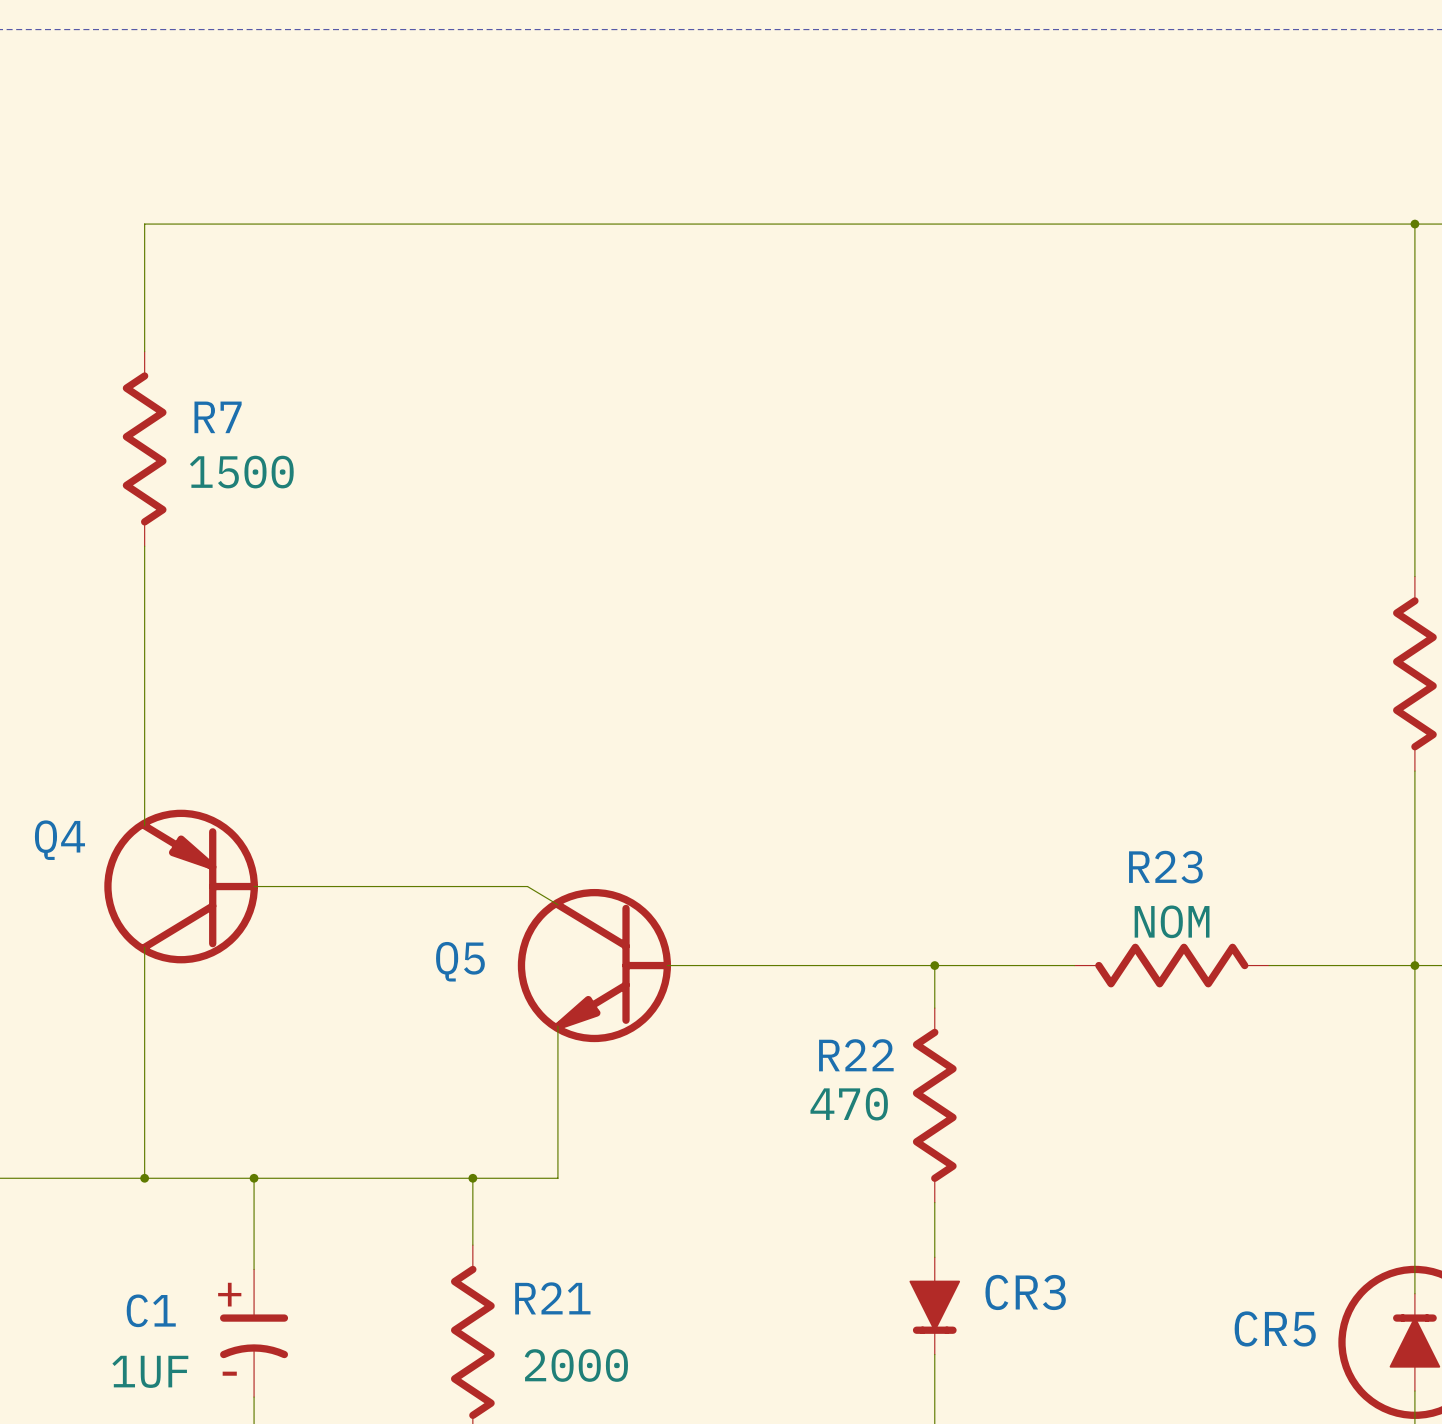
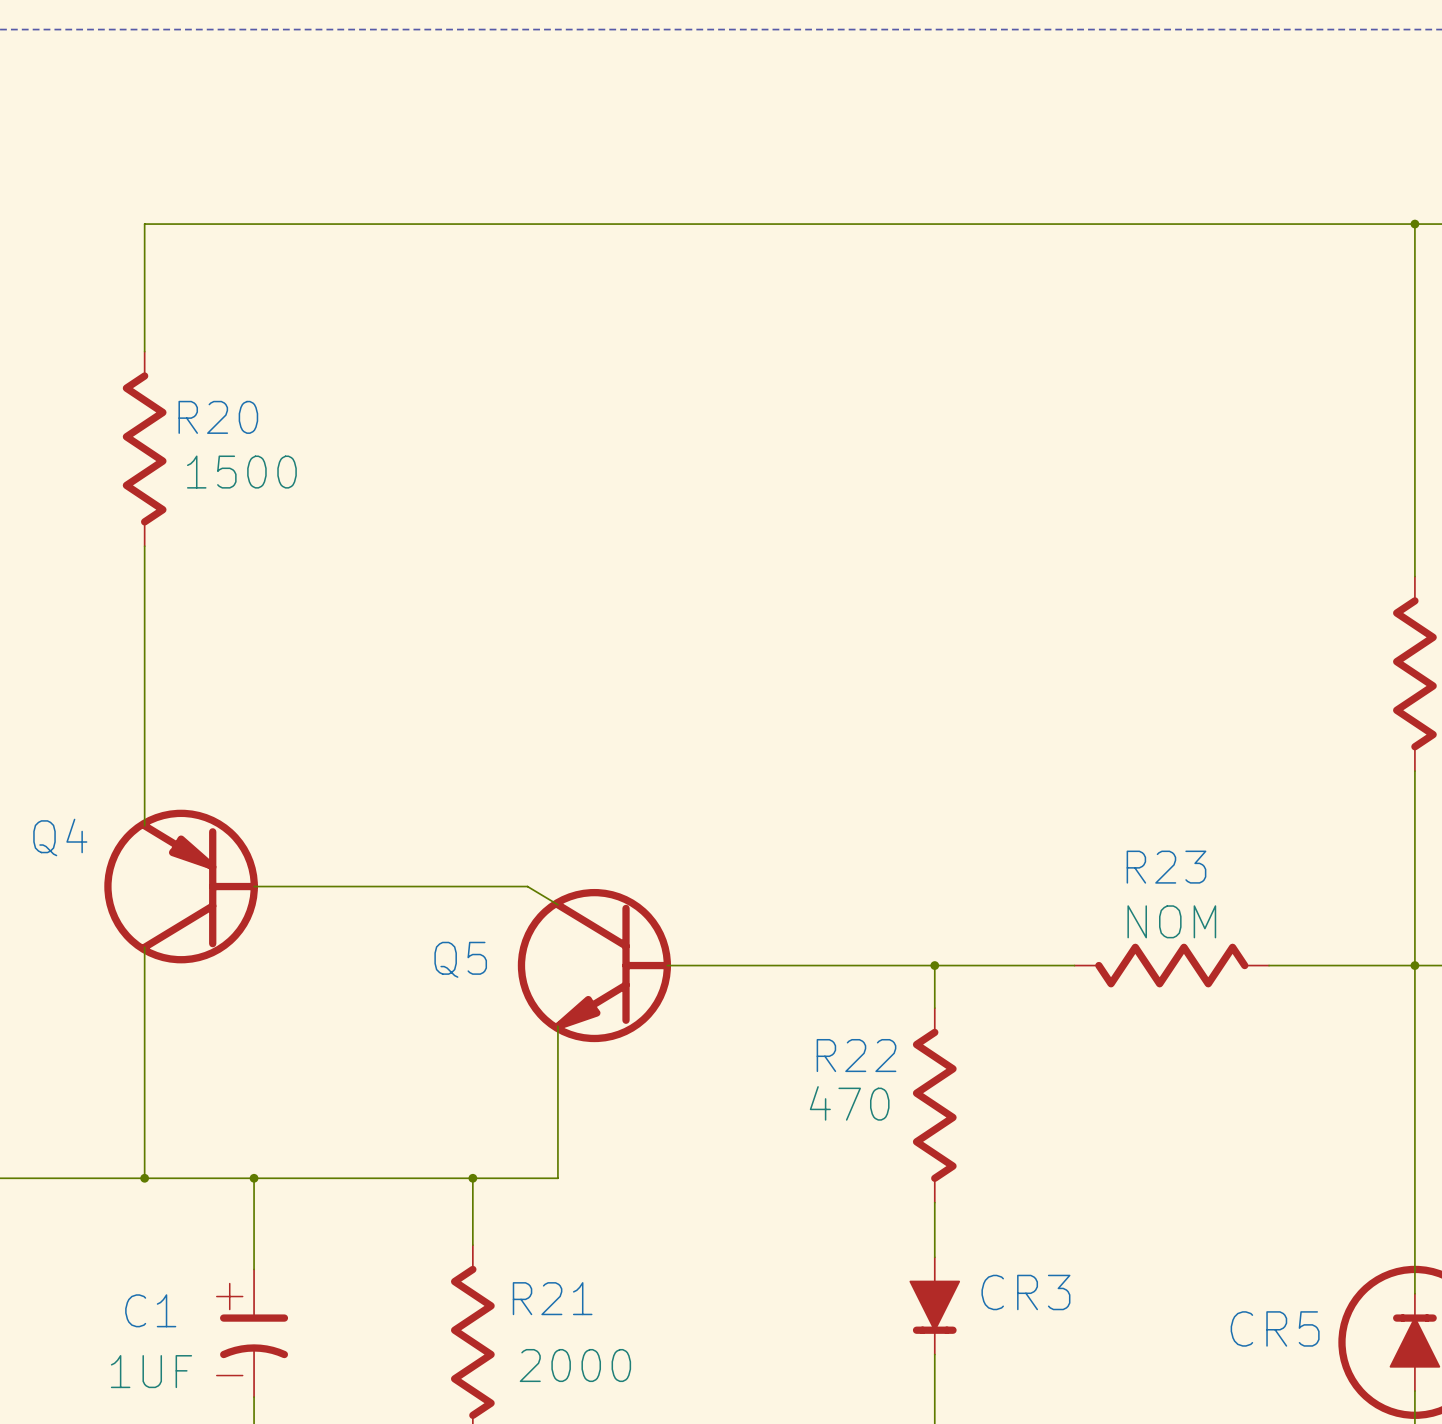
R7 name: R7 (218, 417) -> R20 (218, 417)

